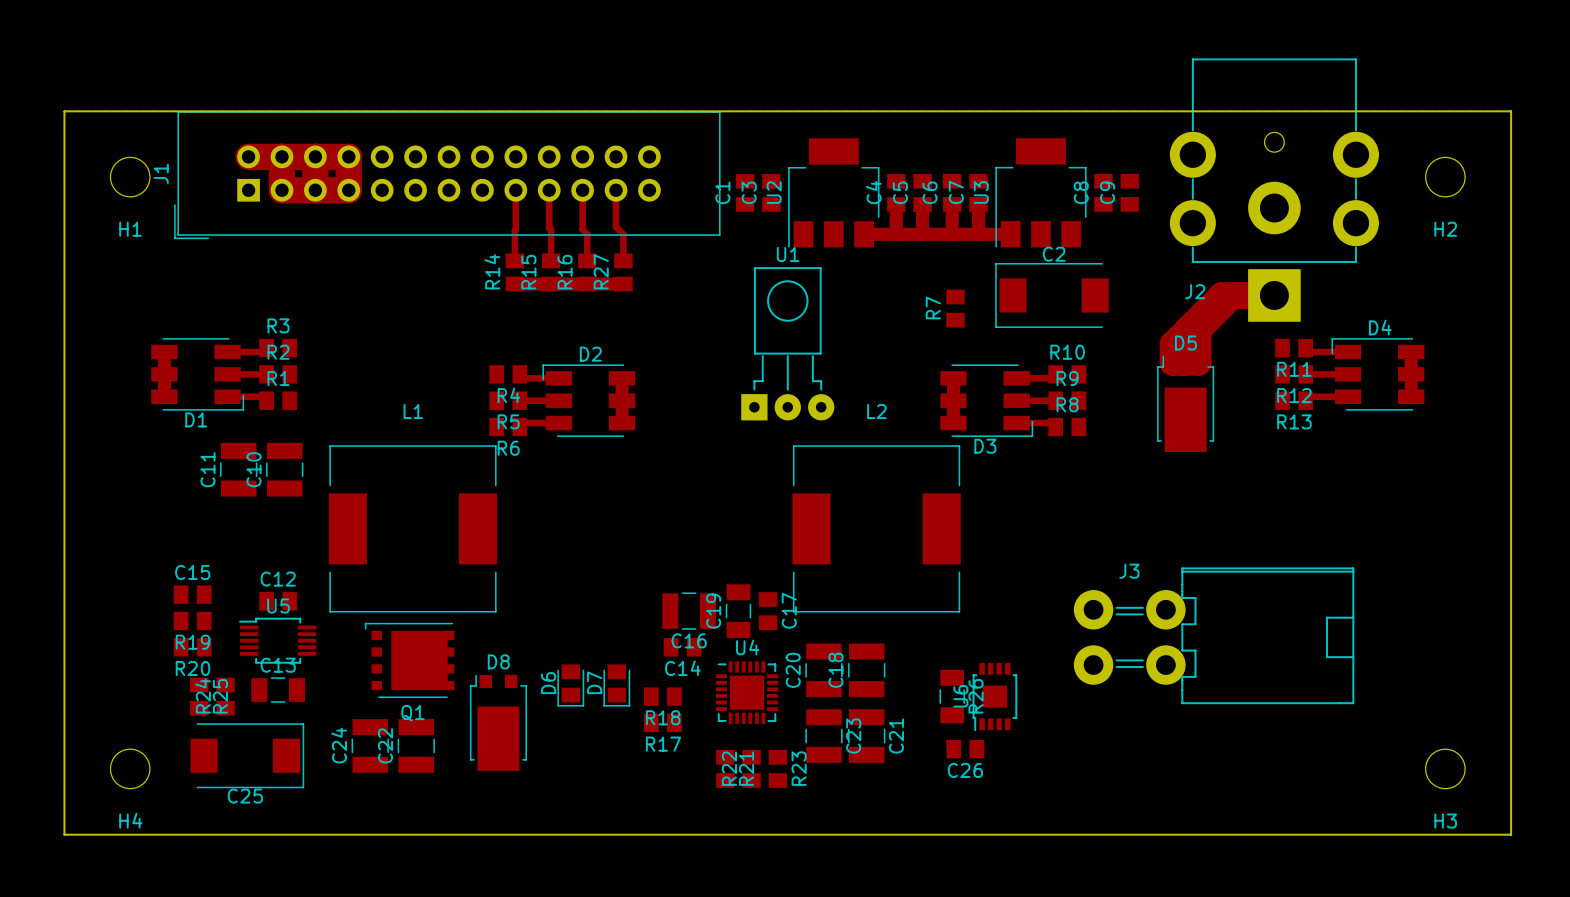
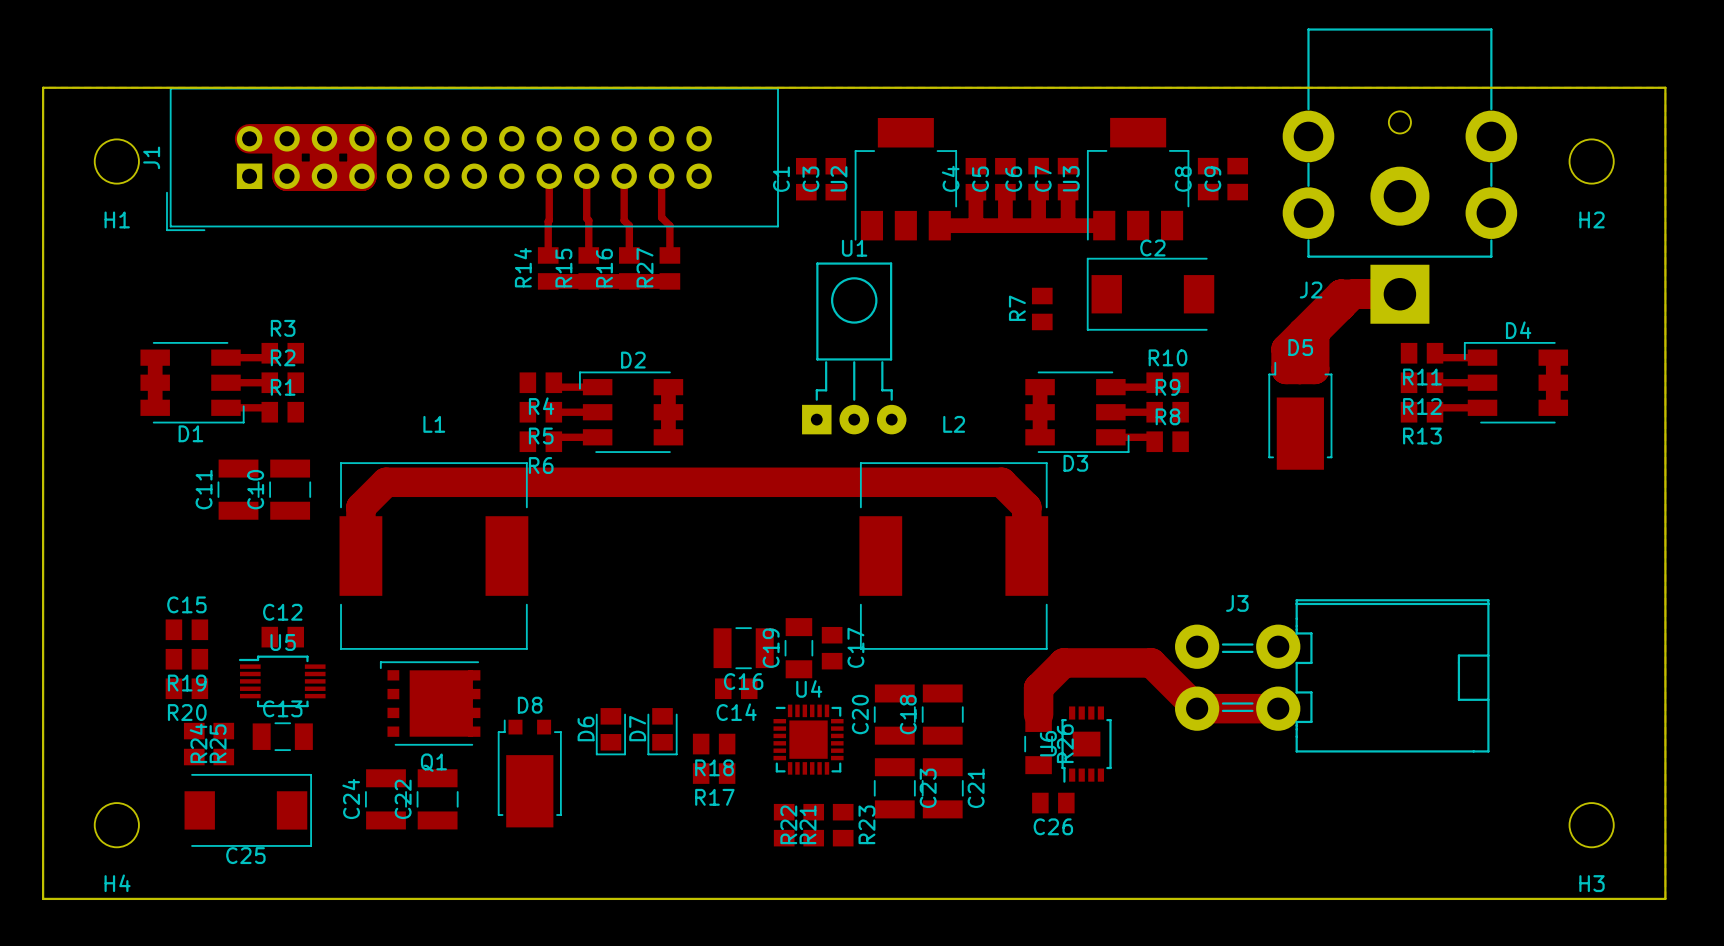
top track: none -> (360, 556) (360, 507) (385, 482) (1001, 482) (1026, 507) (1026, 556)
top track: none -> (1278, 708) (1197, 708) (1151, 662) (1063, 662) (1038, 688) (1038, 714)

